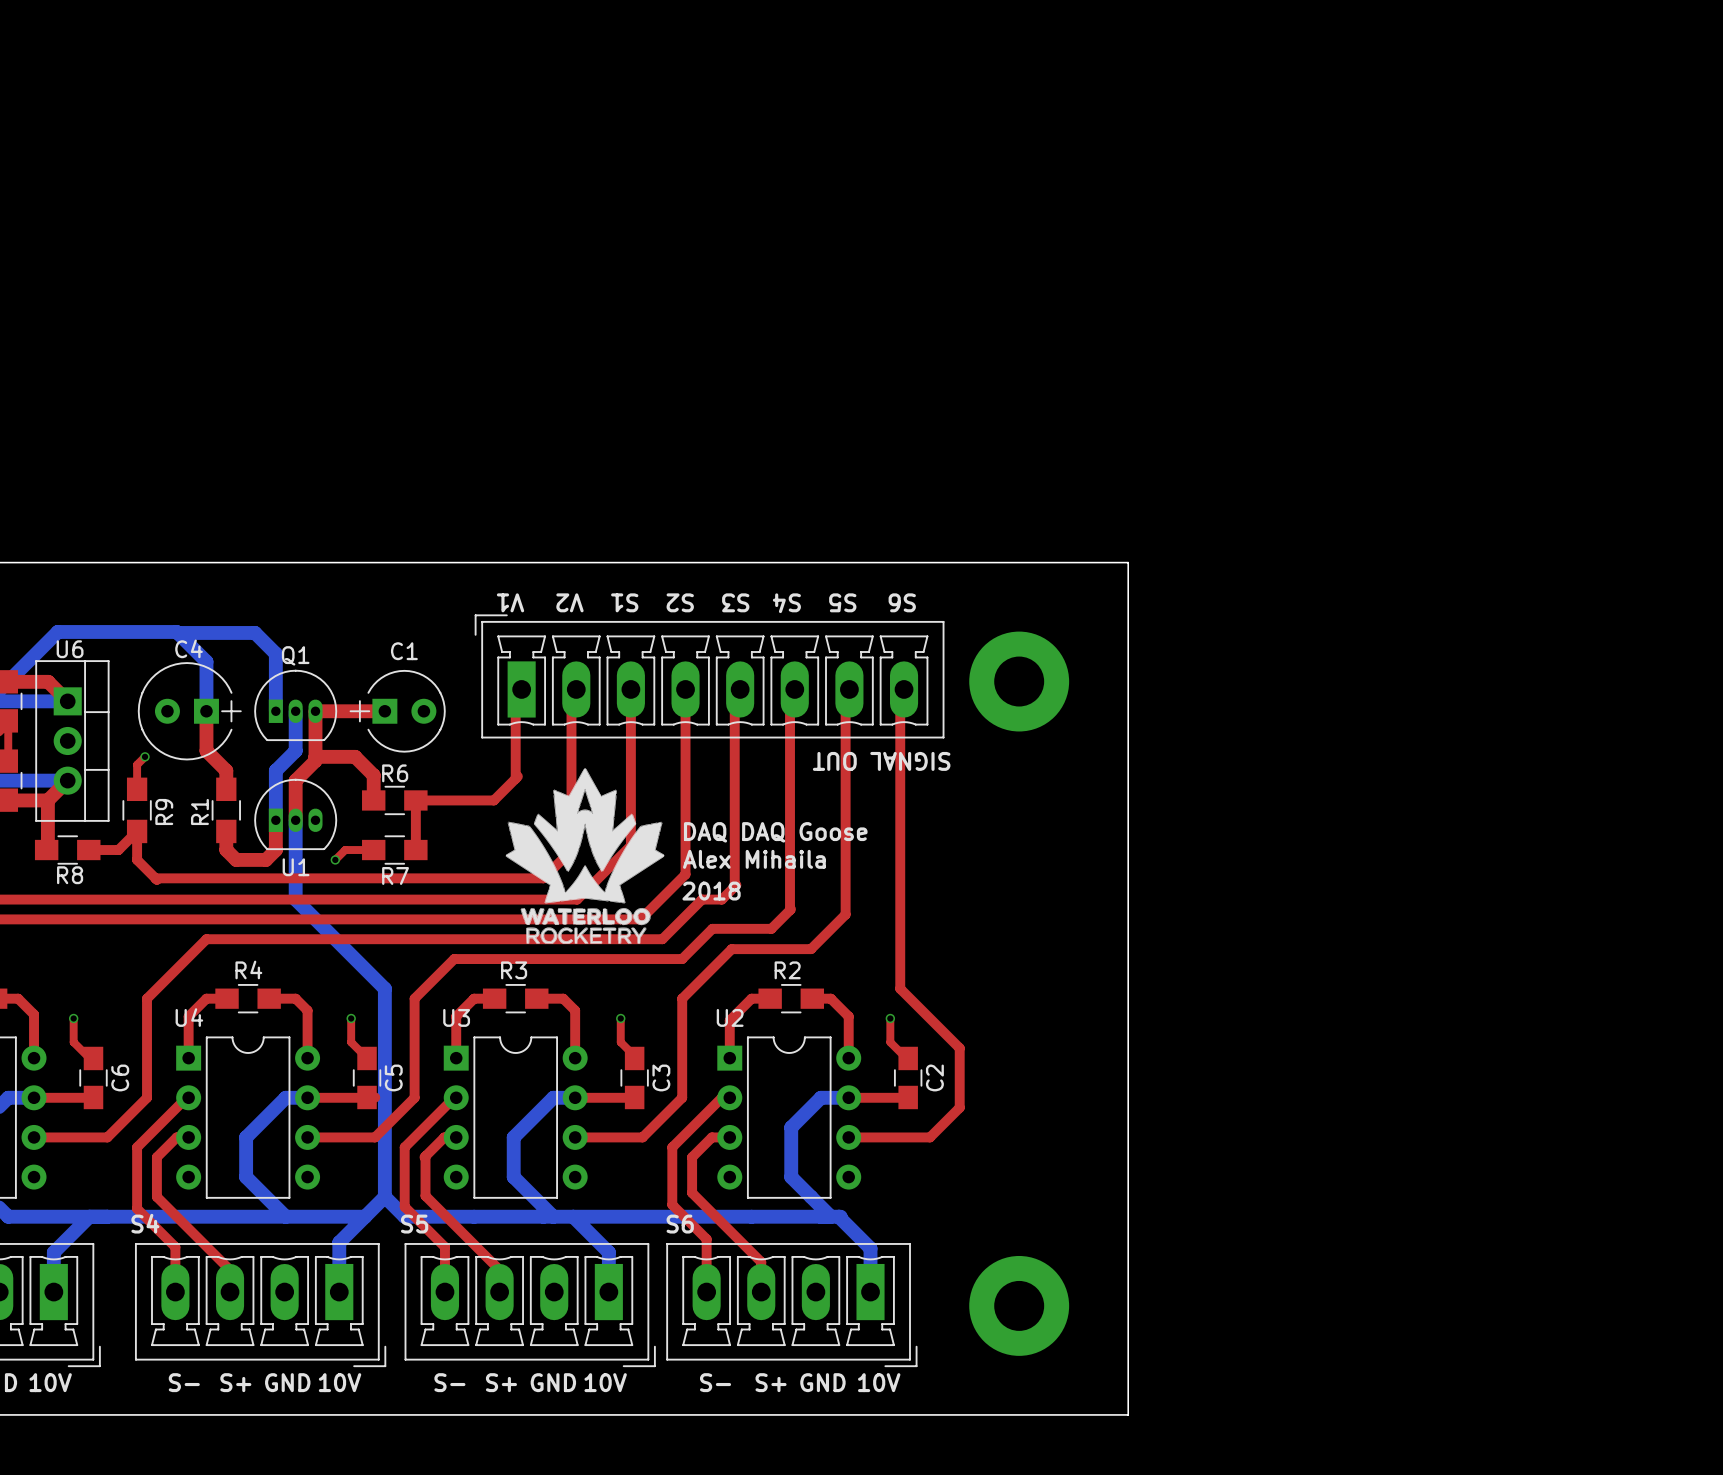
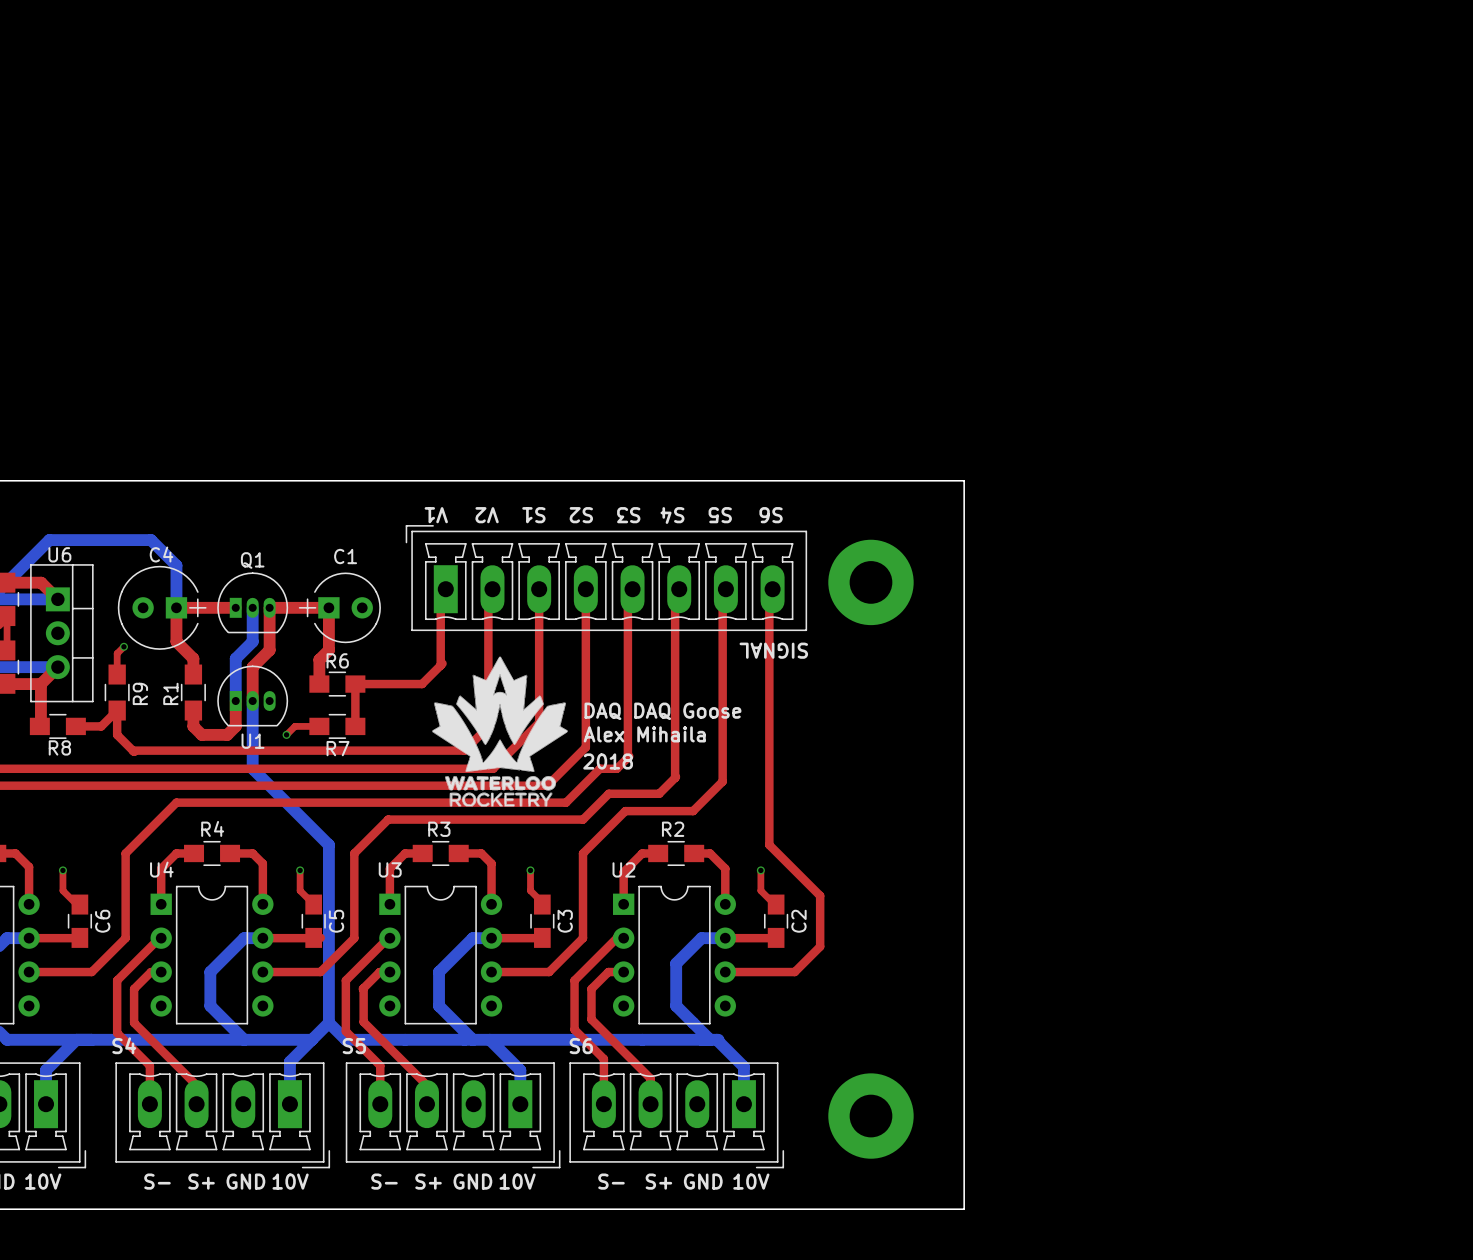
bottom track: (177, 632) (255, 632) (275, 653) (275, 711) -> none
top track: none -> (176, 607) (235, 607)
top track: (315, 756) (355, 756) (373, 775) -> (328, 607) (328, 650) (319, 659) (319, 662)
text: SIGNAL OUT (881, 761) -> SIGNAL (773, 650)

